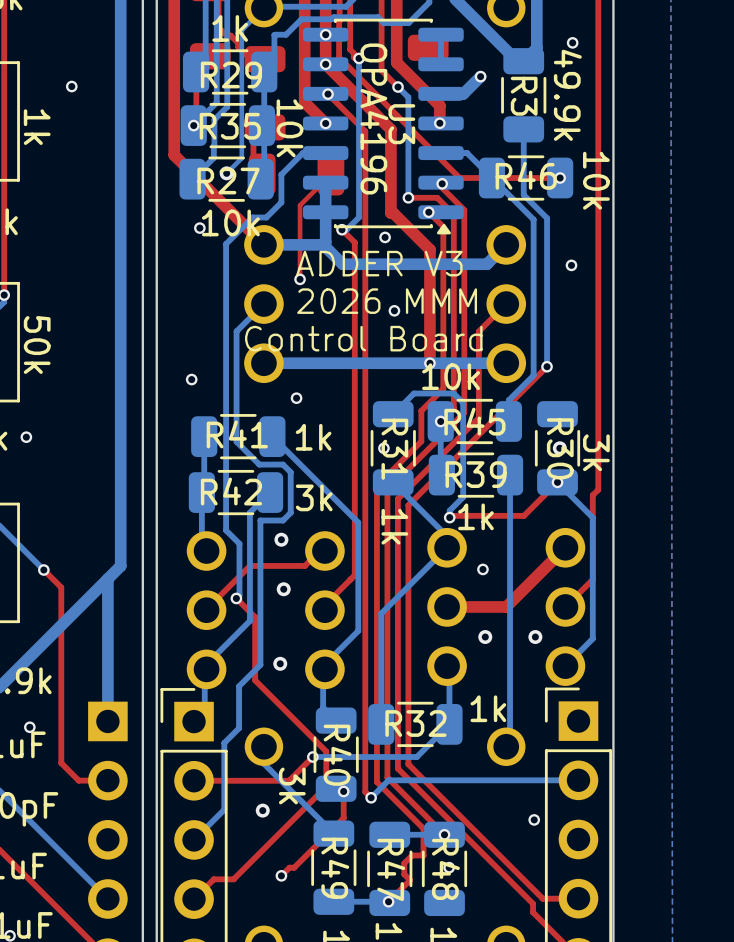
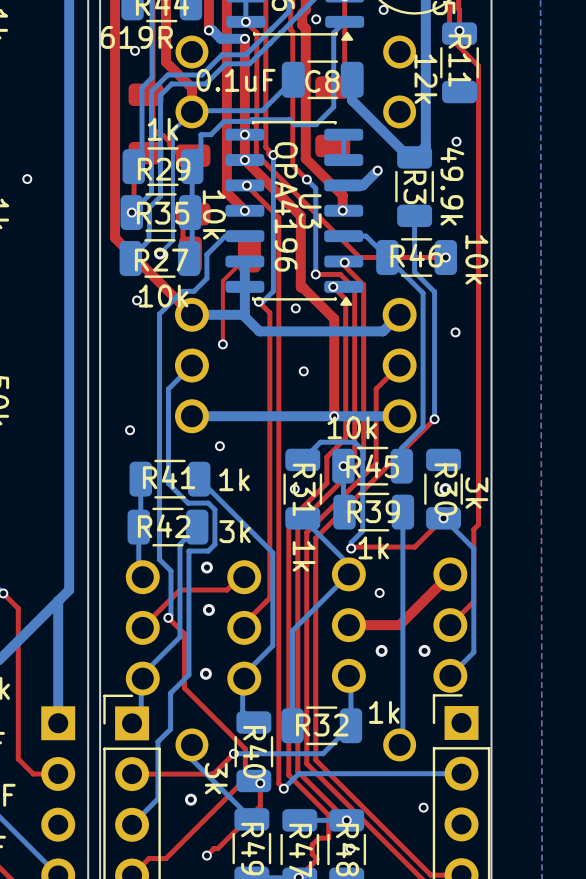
text: ADDER V3 (379, 263) -> none
text: 2026 MMM (387, 301) -> none
text: Control Board (363, 338) -> none

